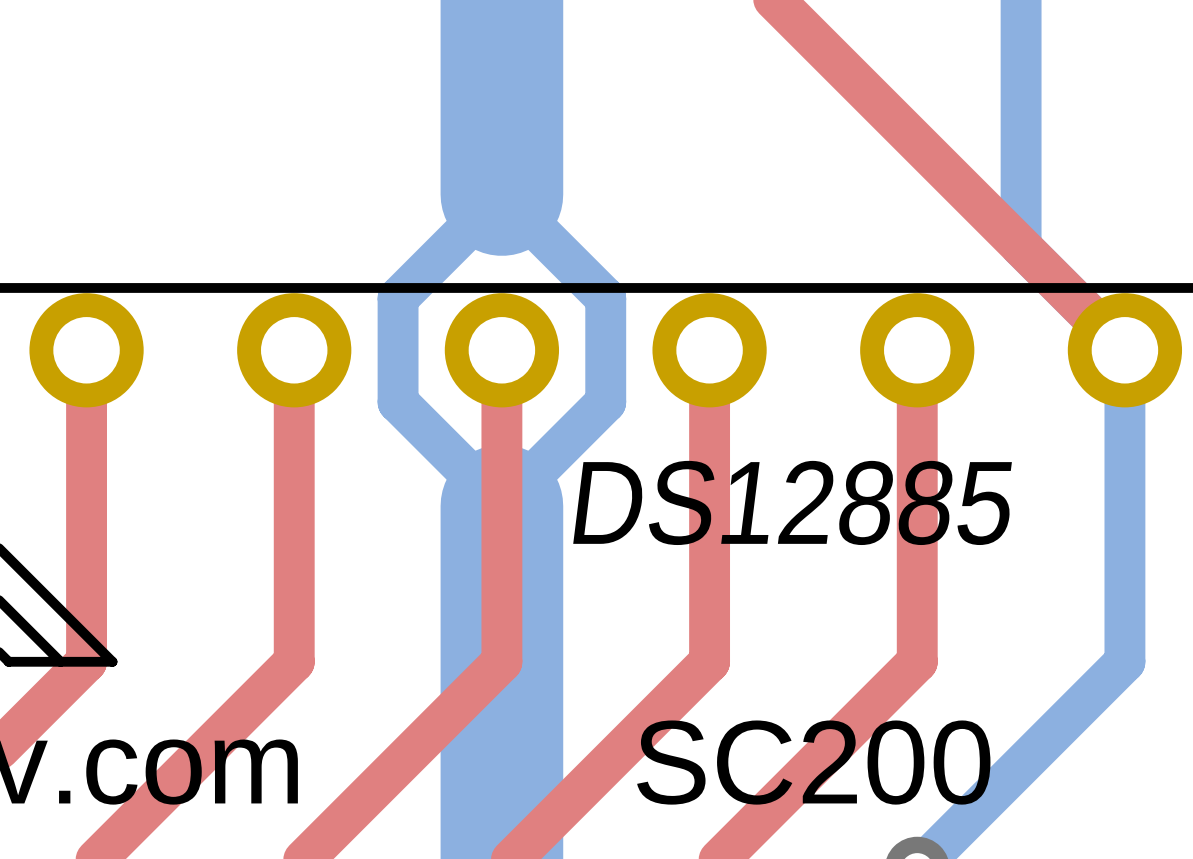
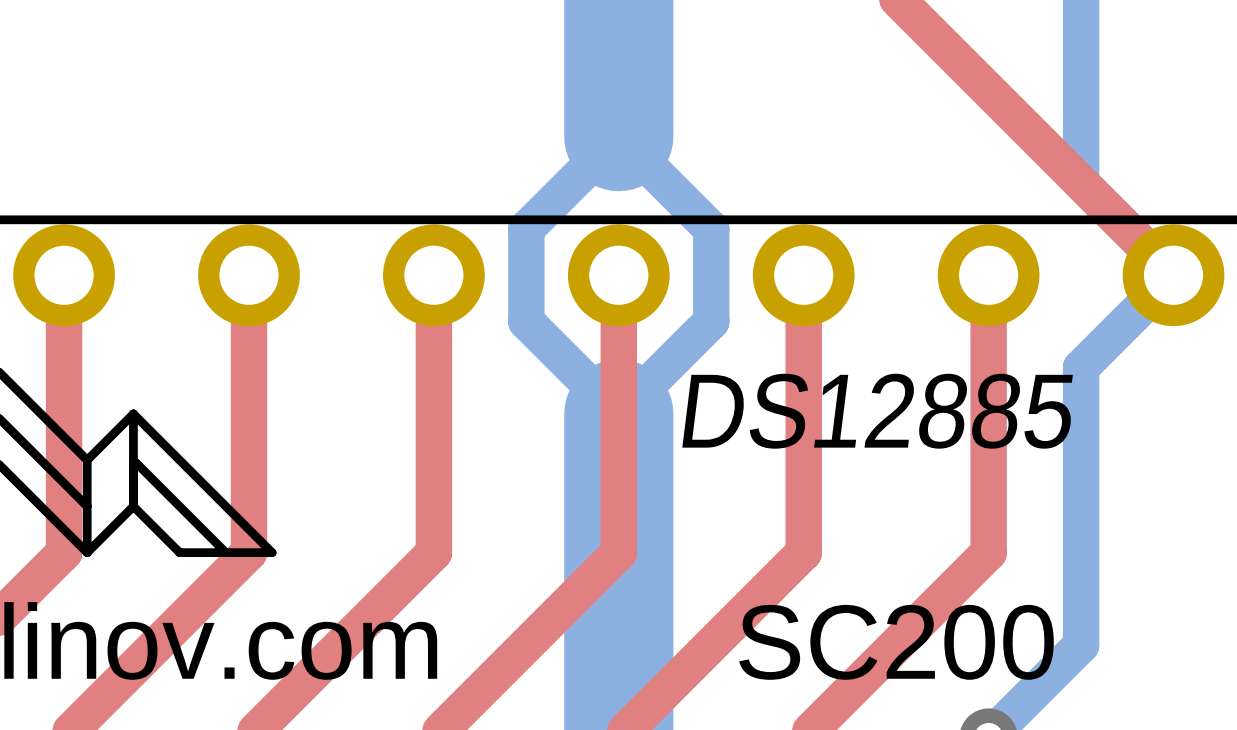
bottom track: (1124, 350) (1124, 661) (1021, 765) -> (1173, 275) (1081, 367) (1081, 645)

